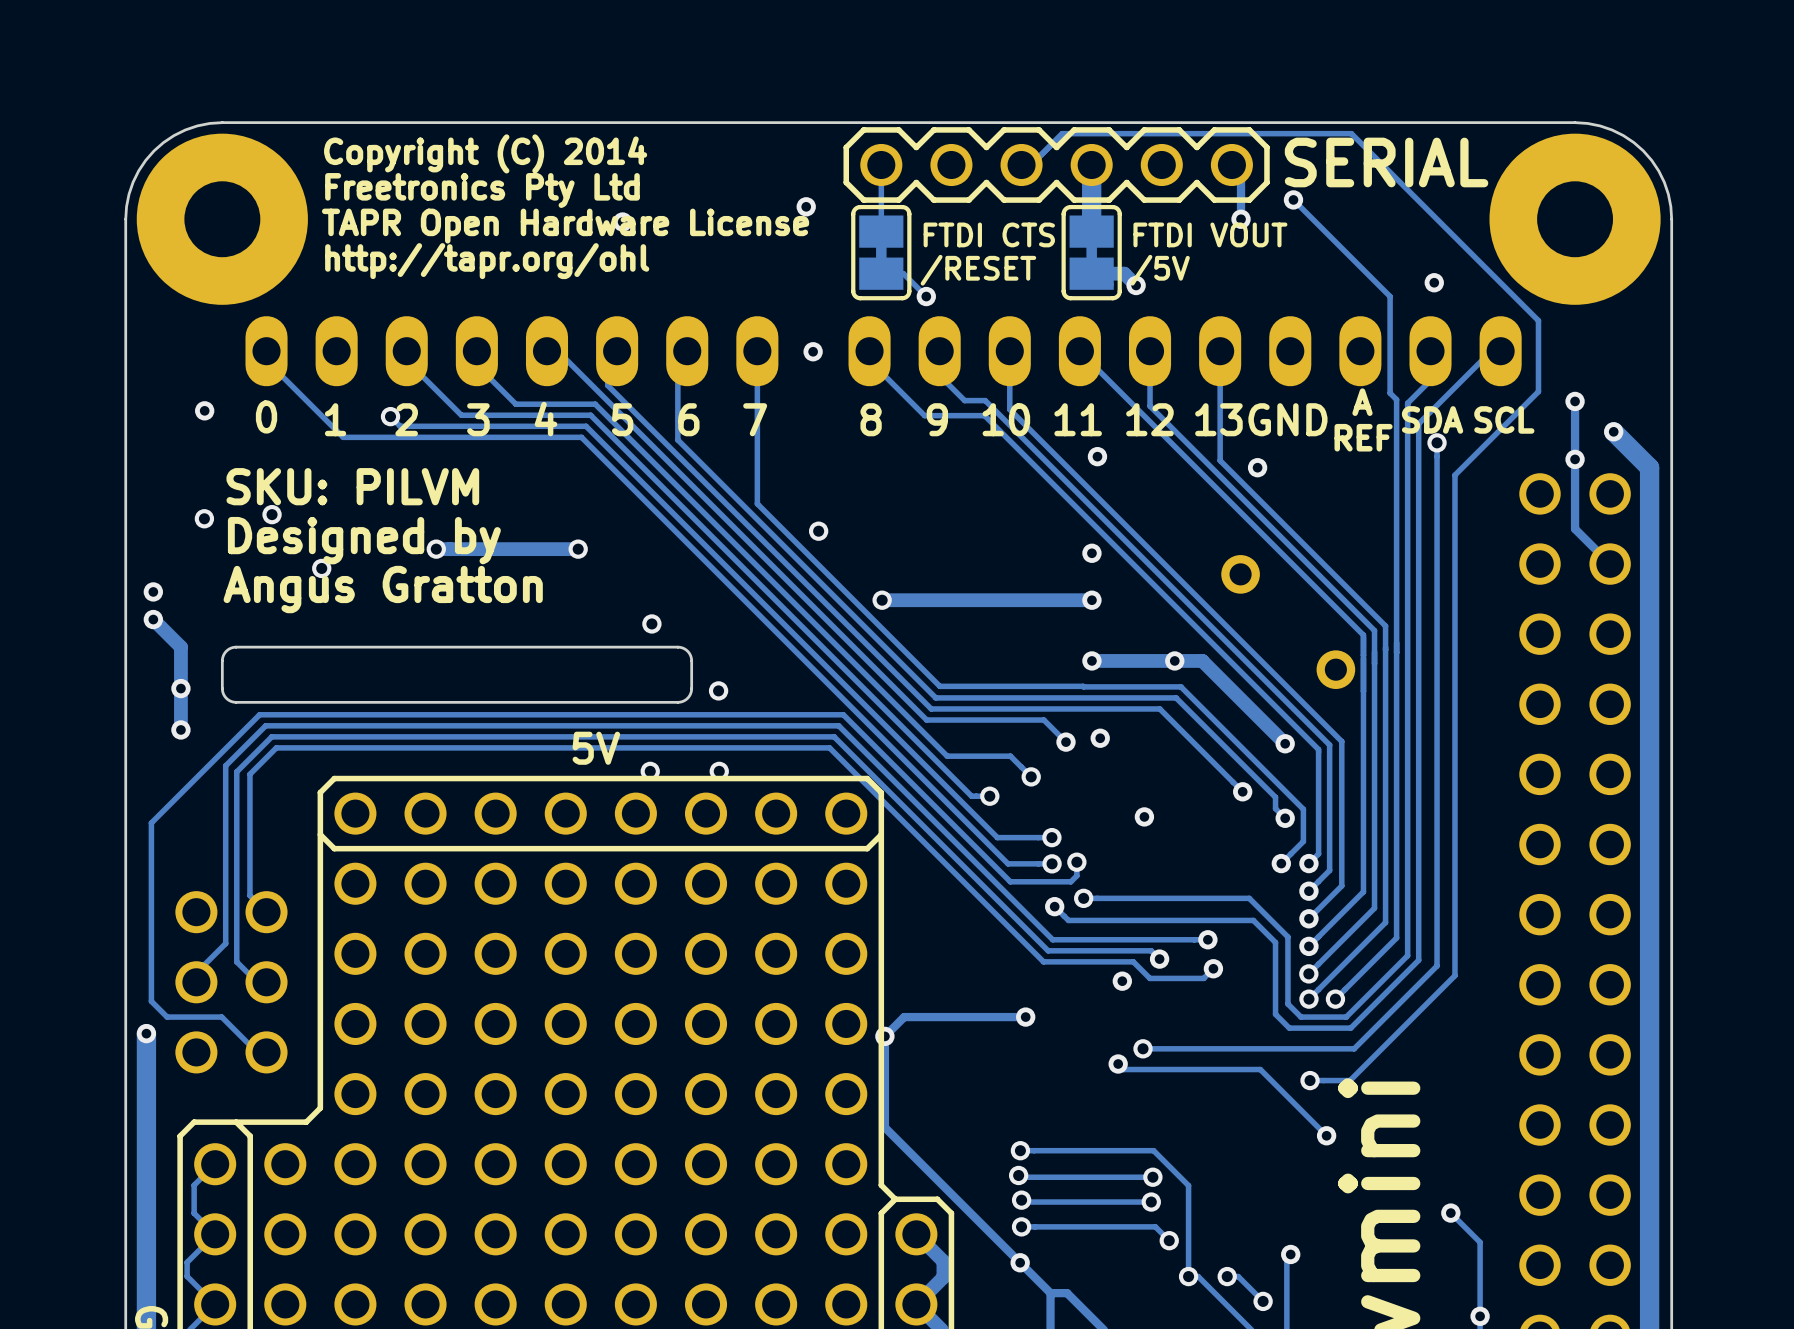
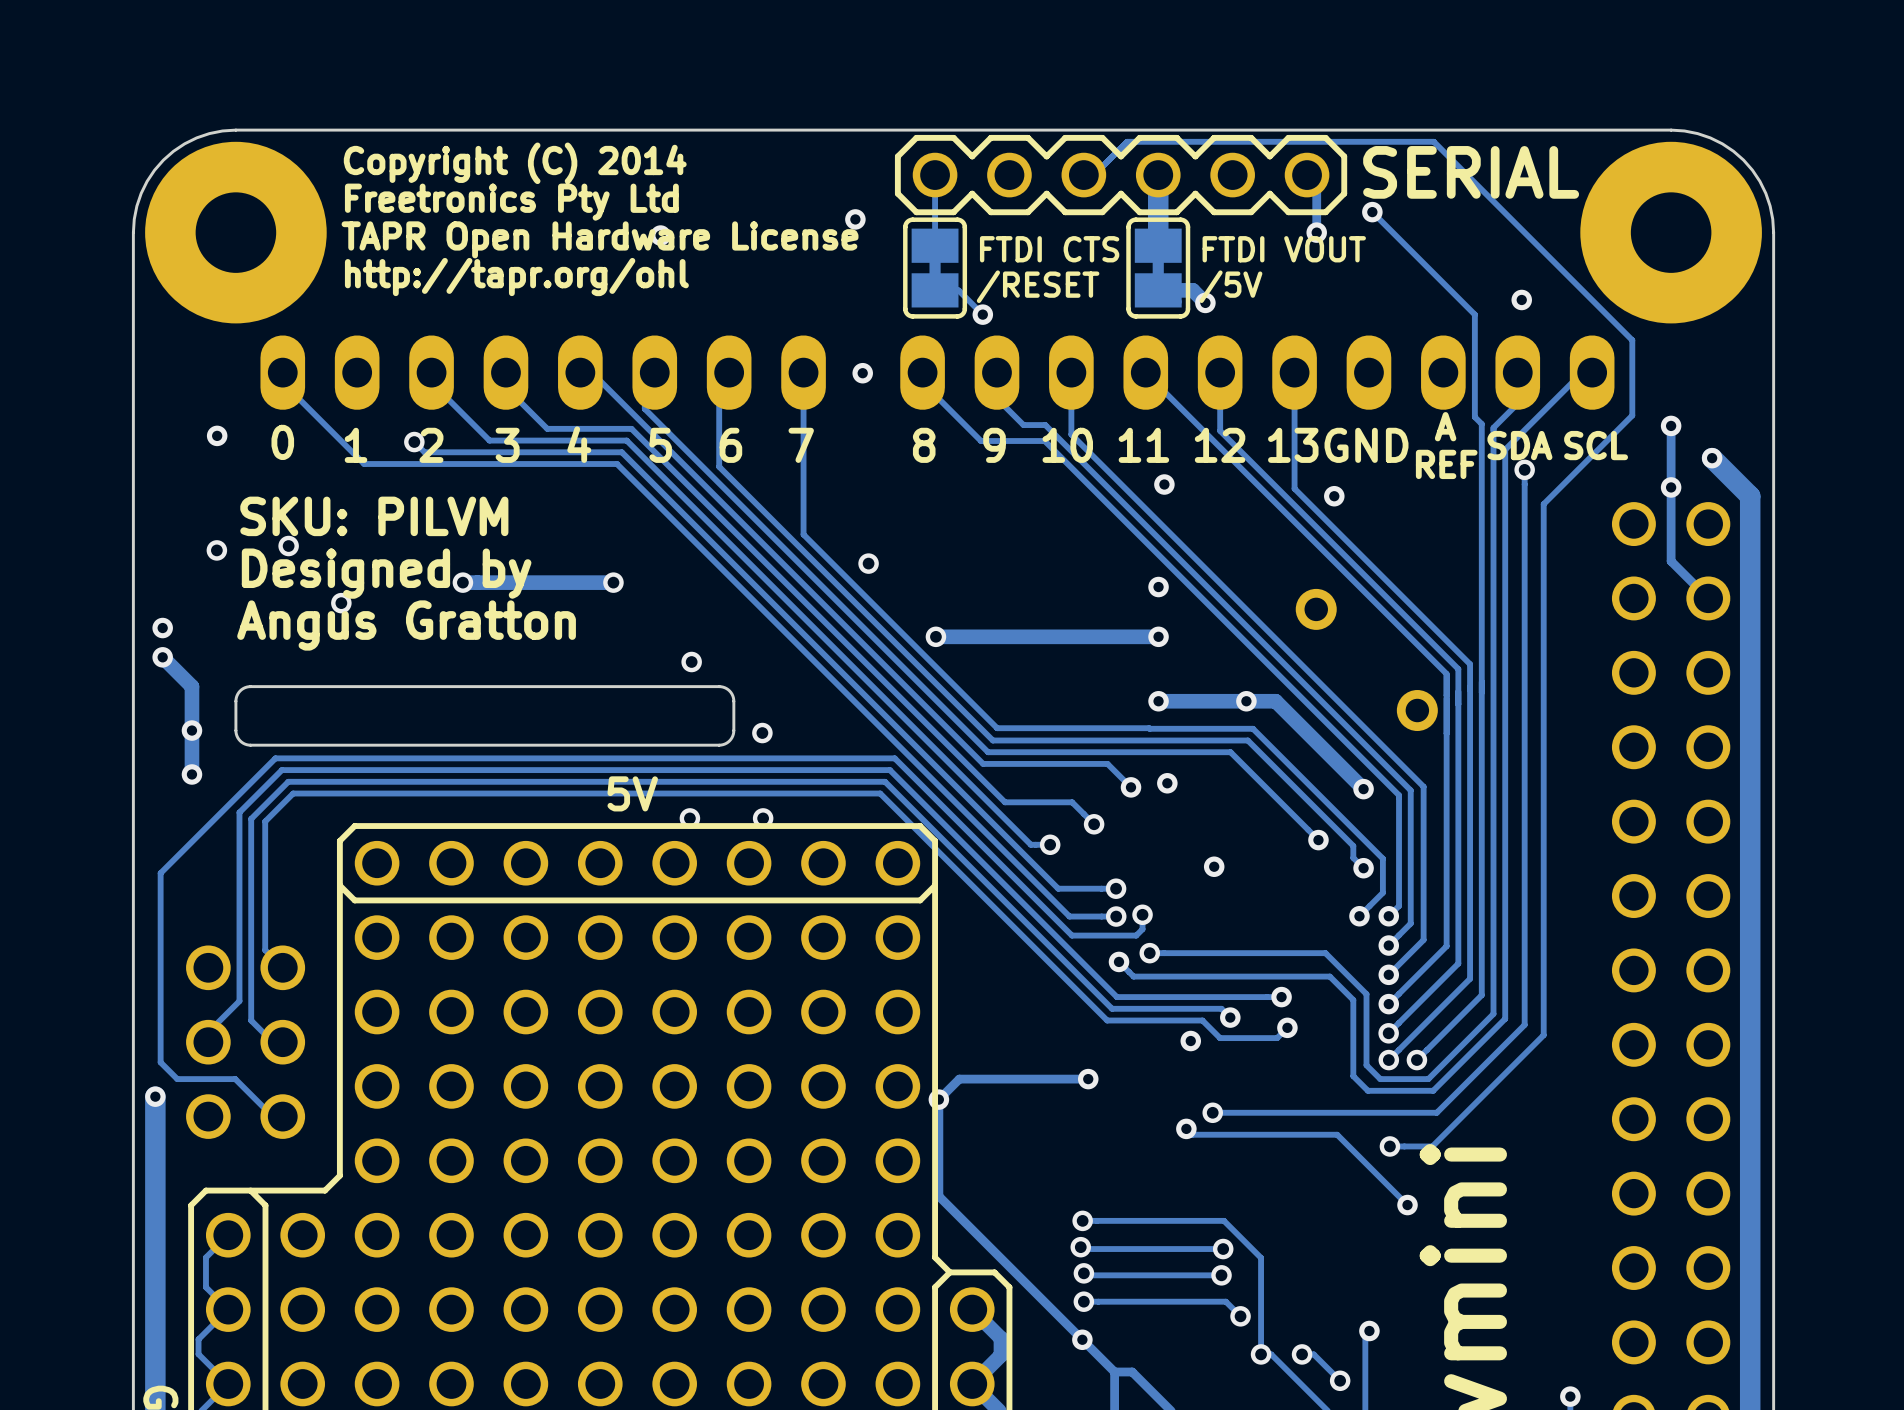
track: (1450, 1213) (1480, 1242) (1480, 1316) -> none
via: (1450, 1213) -> none

